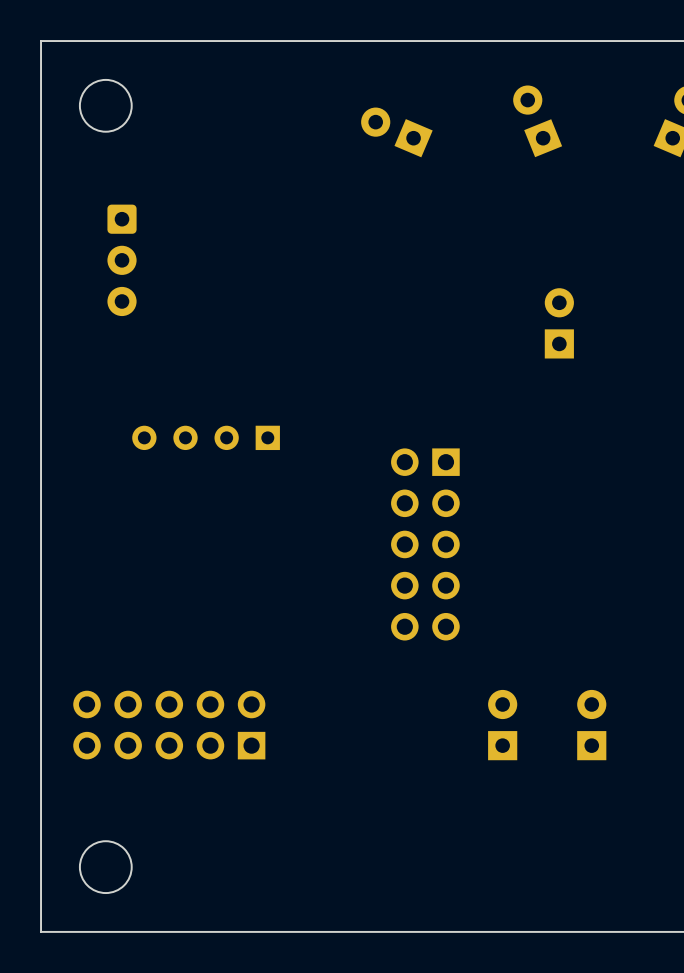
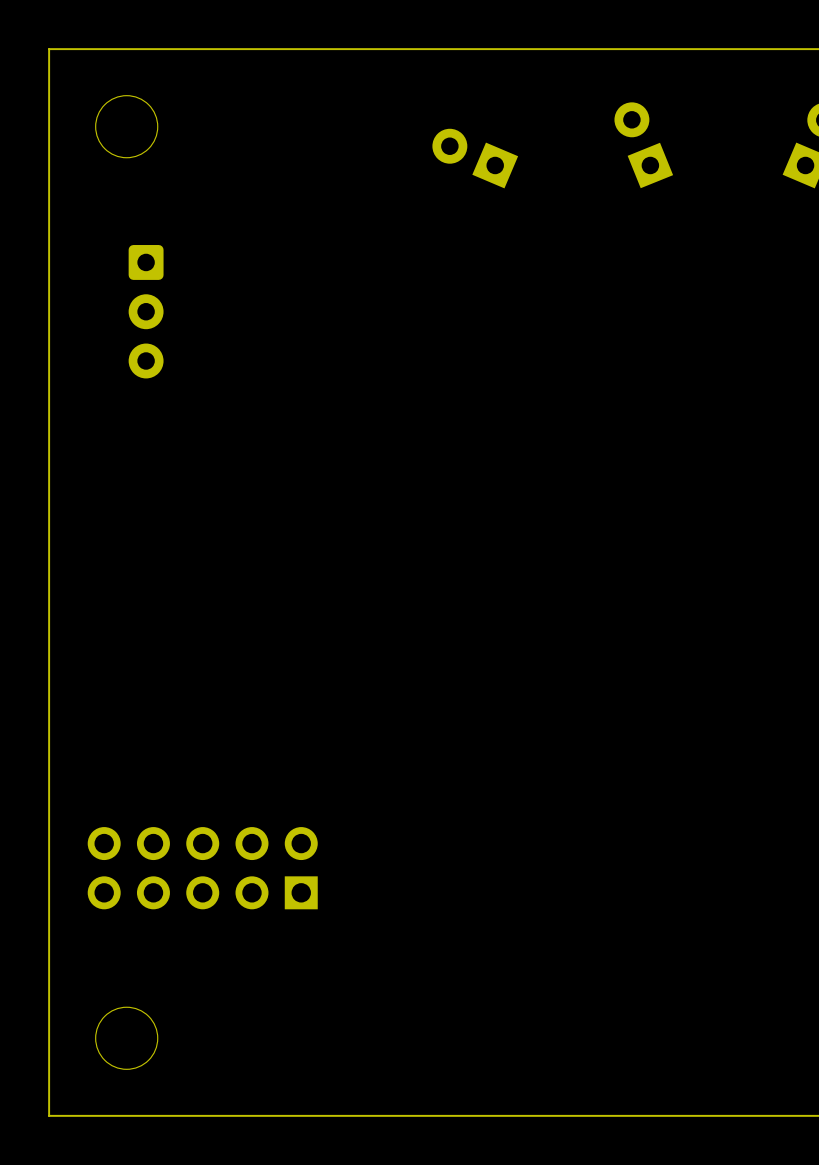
part: (559, 323) -> none
part: (206, 437) -> none
part: (425, 544) -> none
part: (502, 725) -> none
part: (591, 725) -> none

